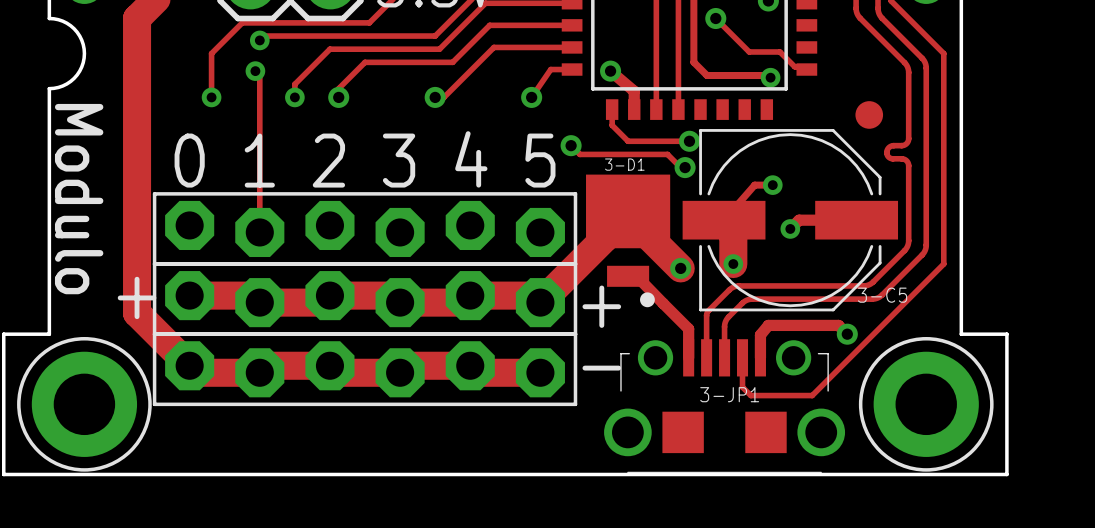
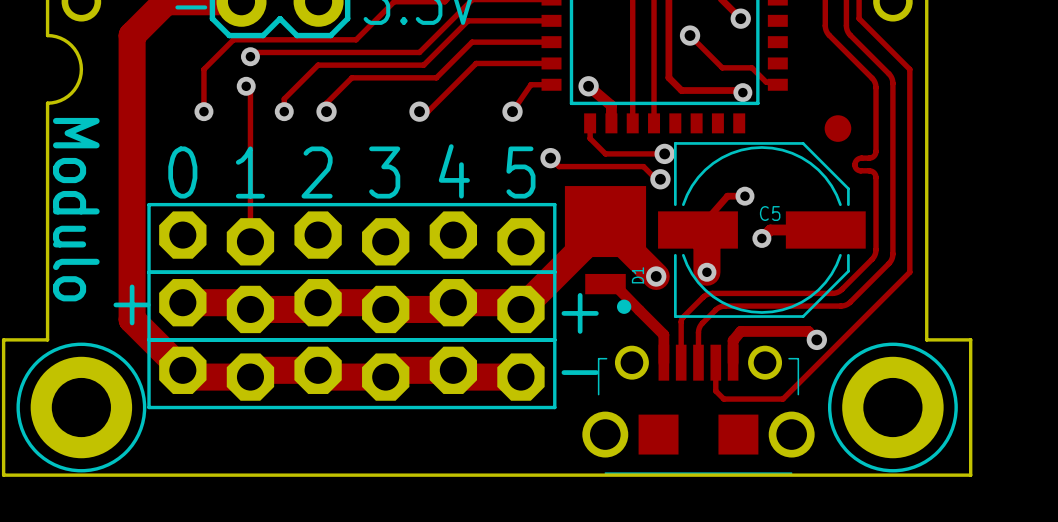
3-D1 name: 3-D1 (624, 164) -> D1 (637, 275)
3-C5 name: 3-C5 (882, 295) -> C5 (770, 213)
3-JP1 name: 3-JP1 (729, 394) -> none

